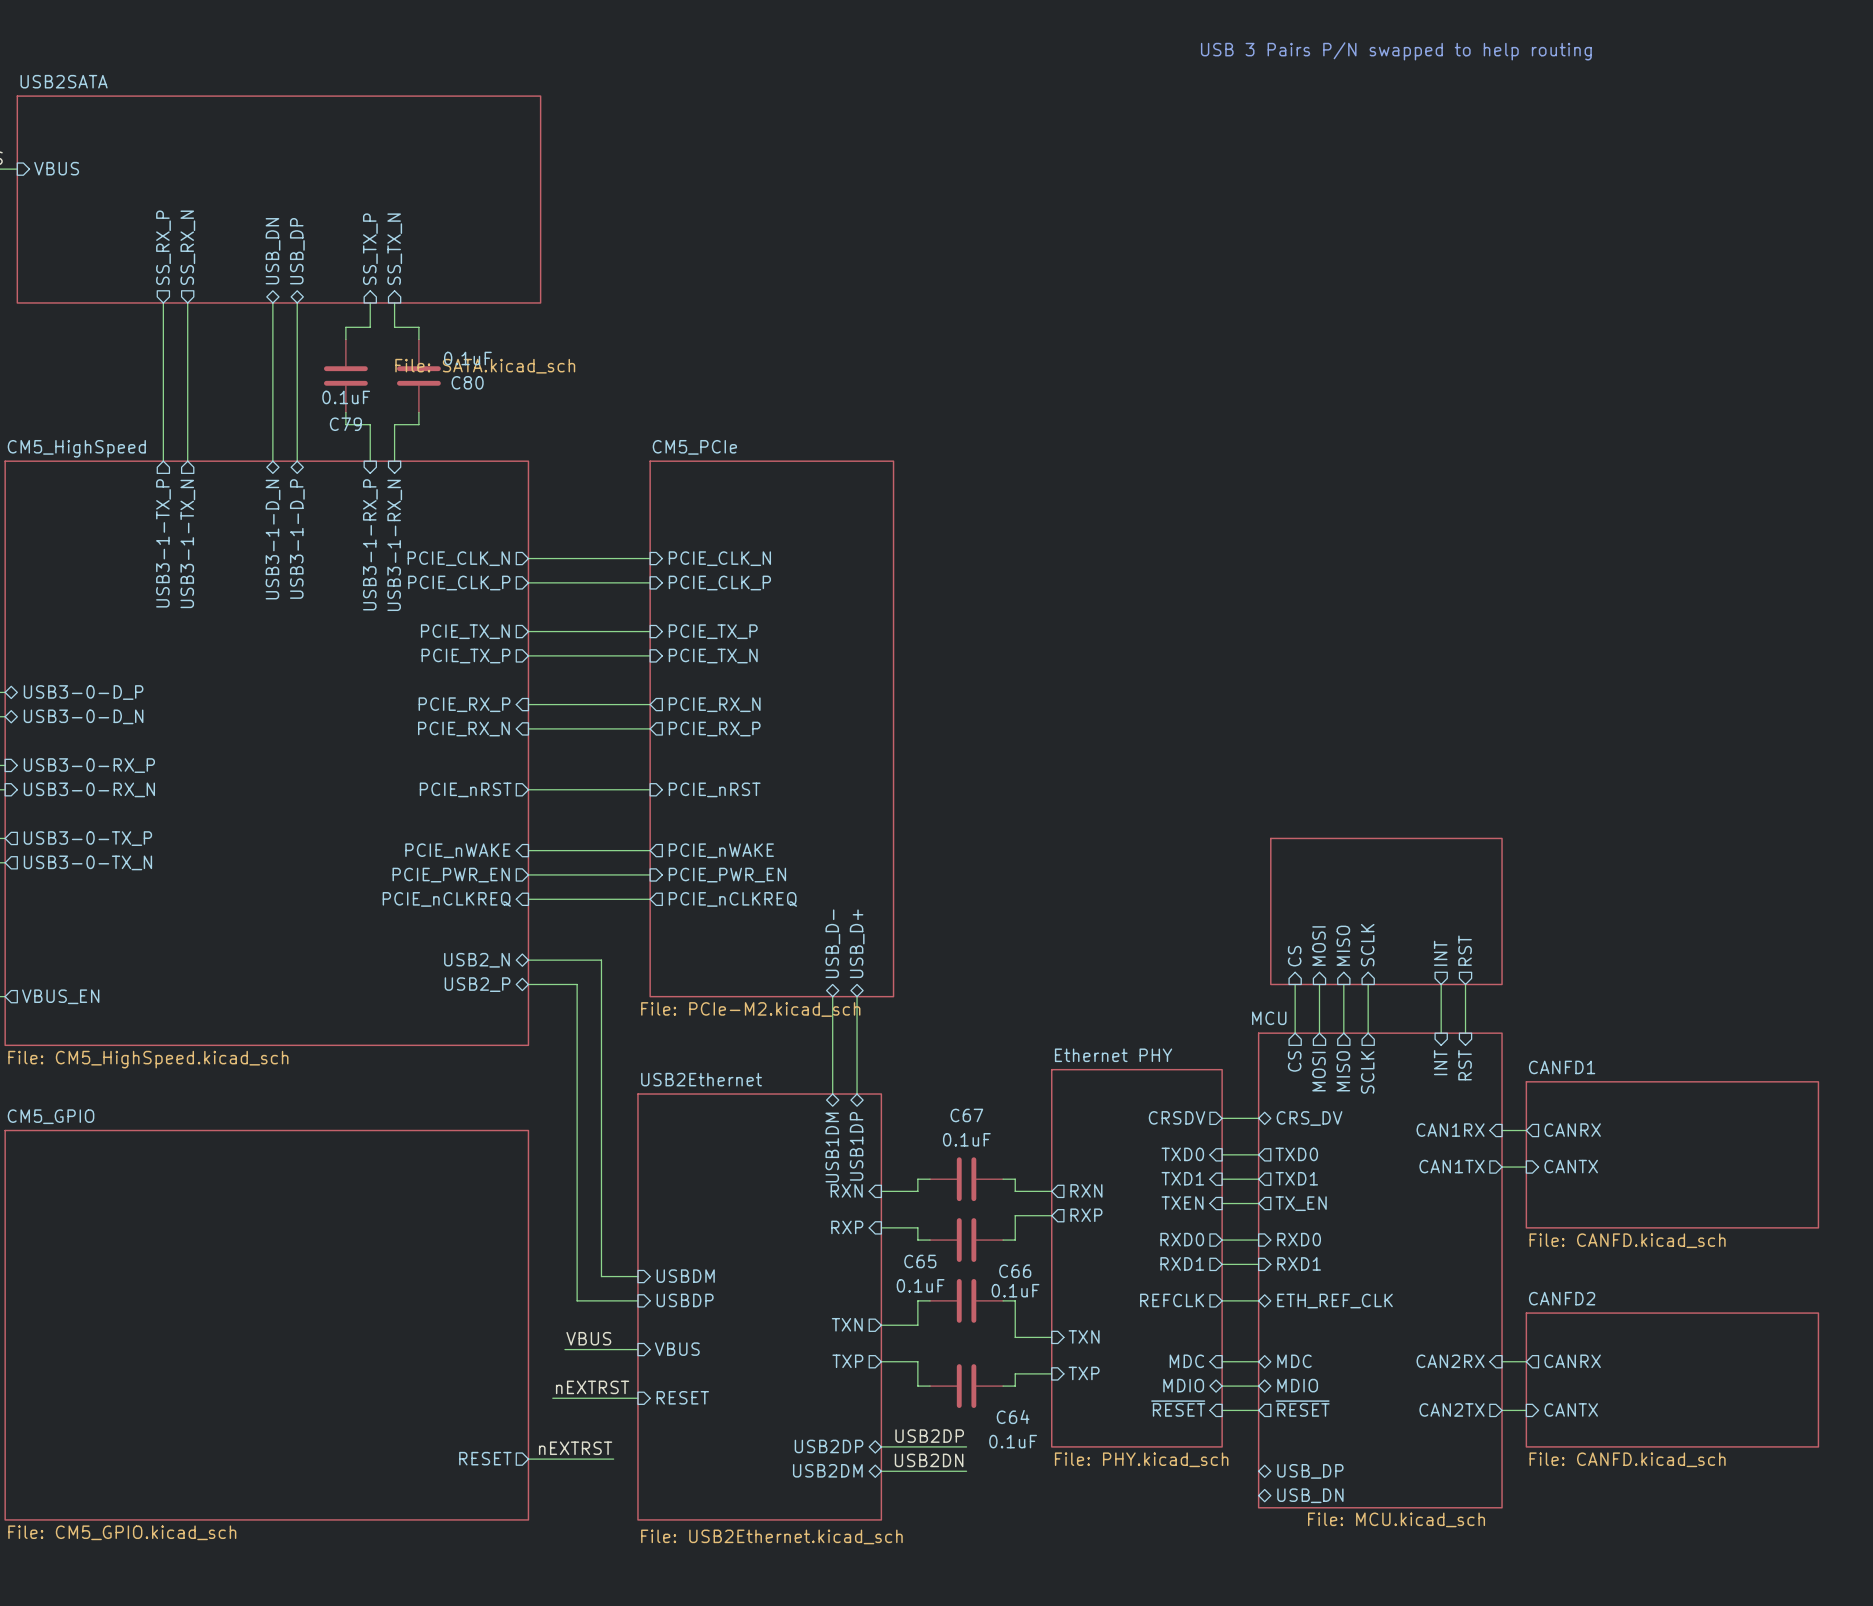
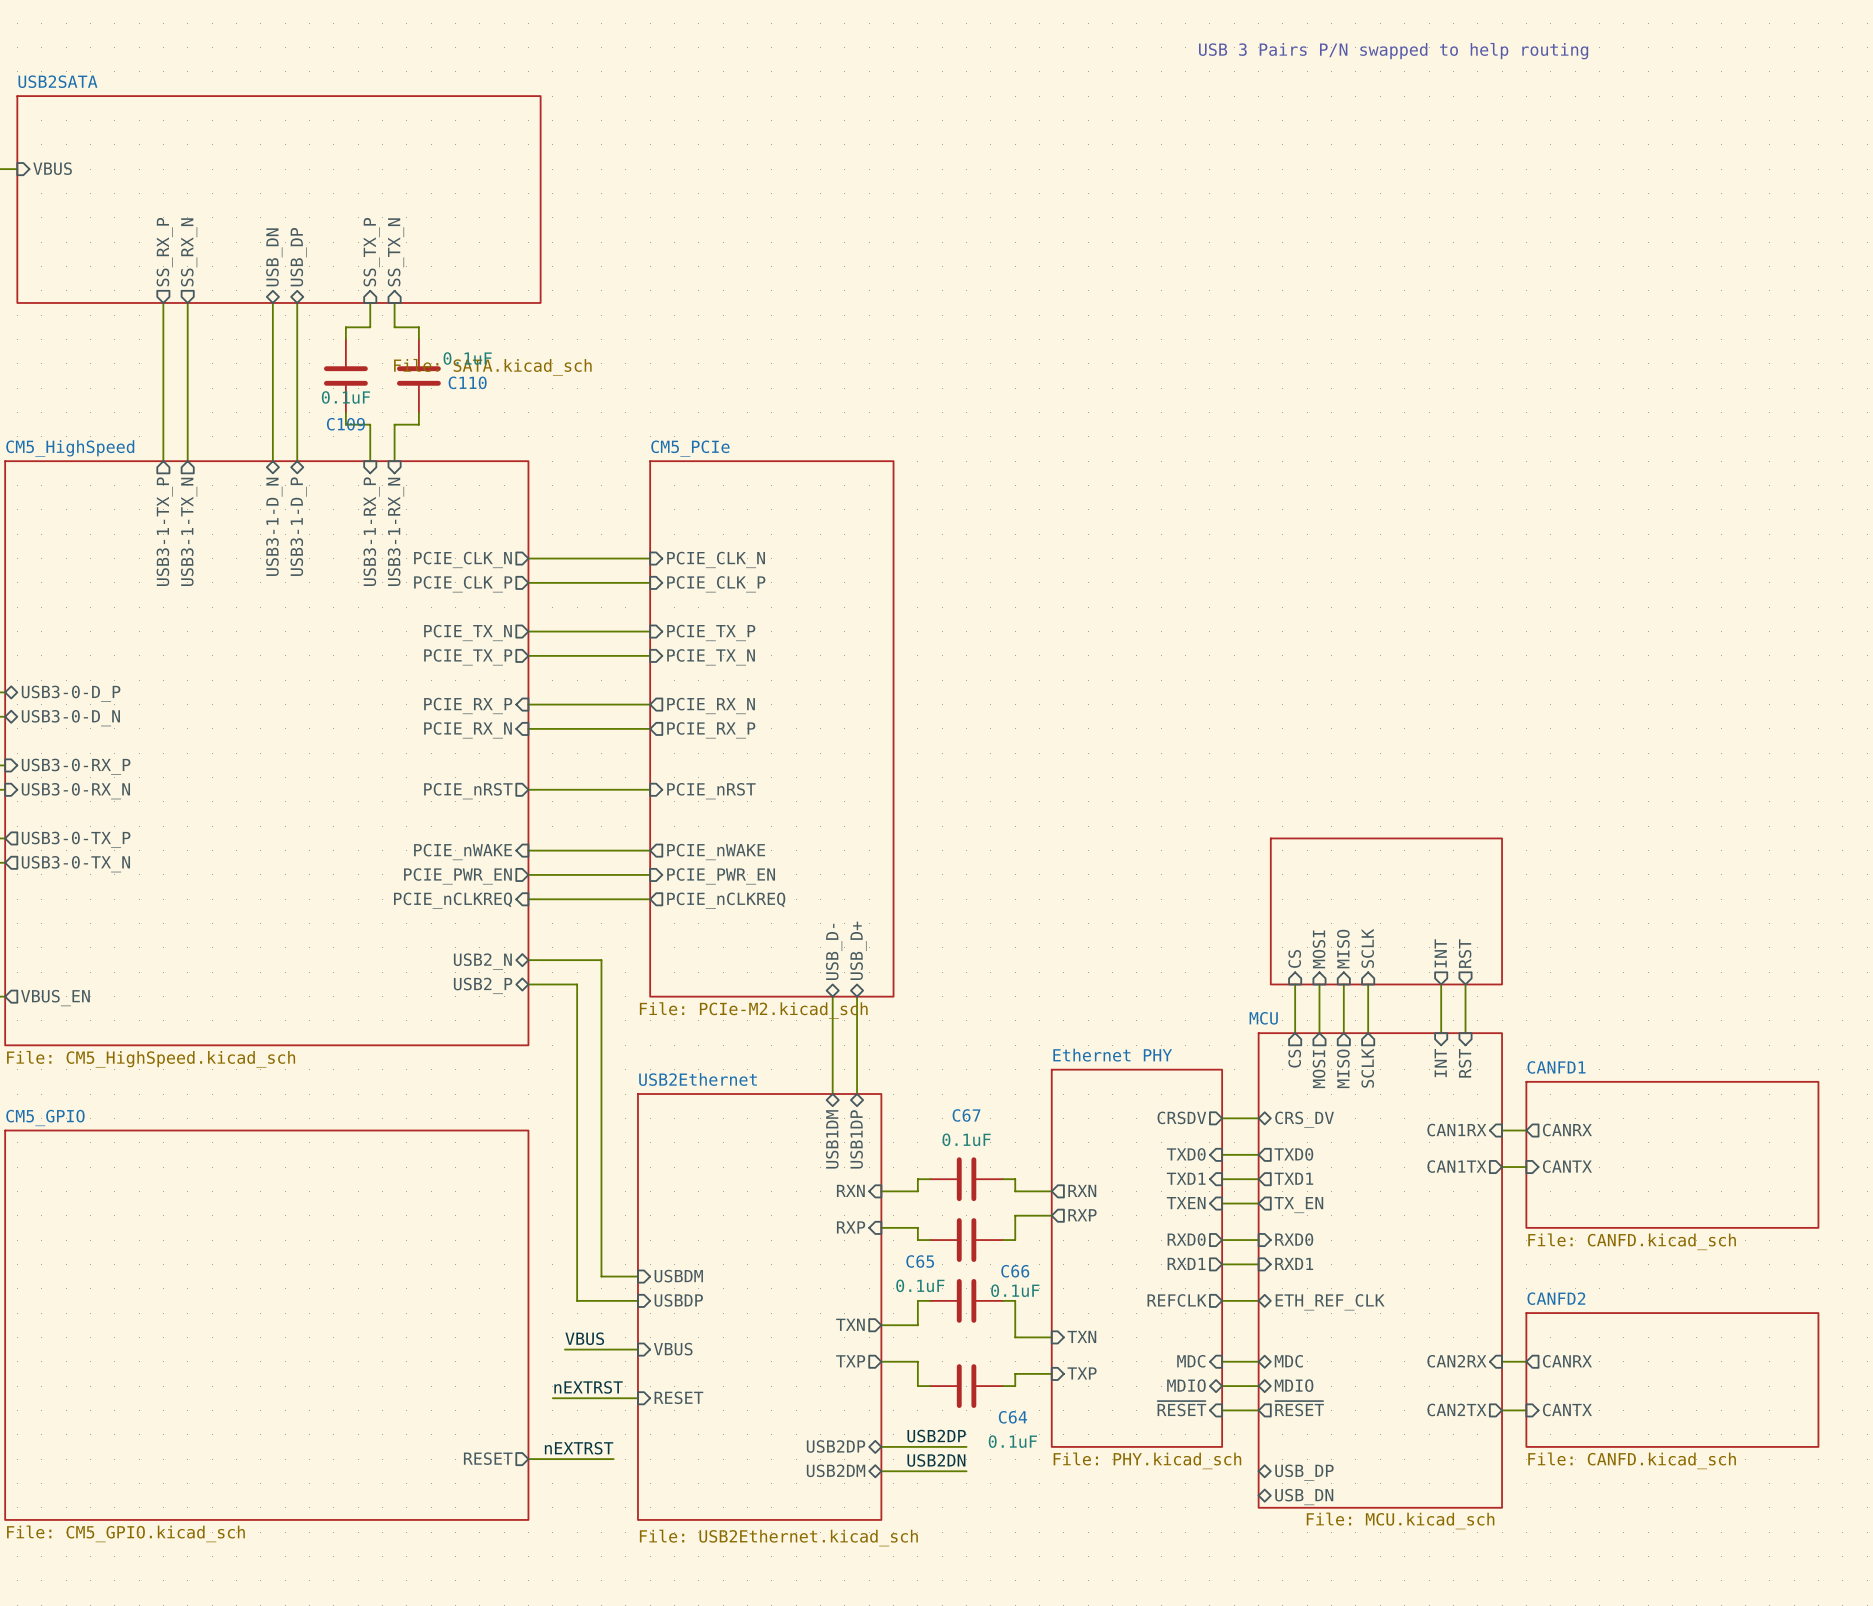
C80 name: C80 (467, 382) -> C110 (467, 382)
C79 name: C79 (345, 424) -> C109 (345, 424)

